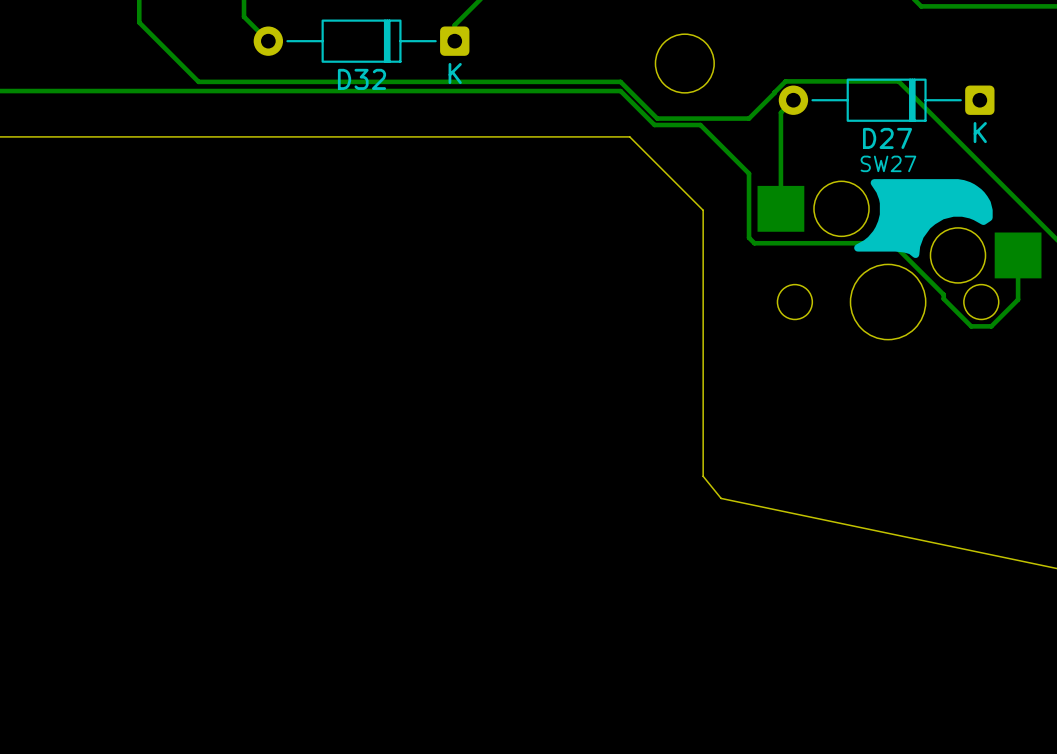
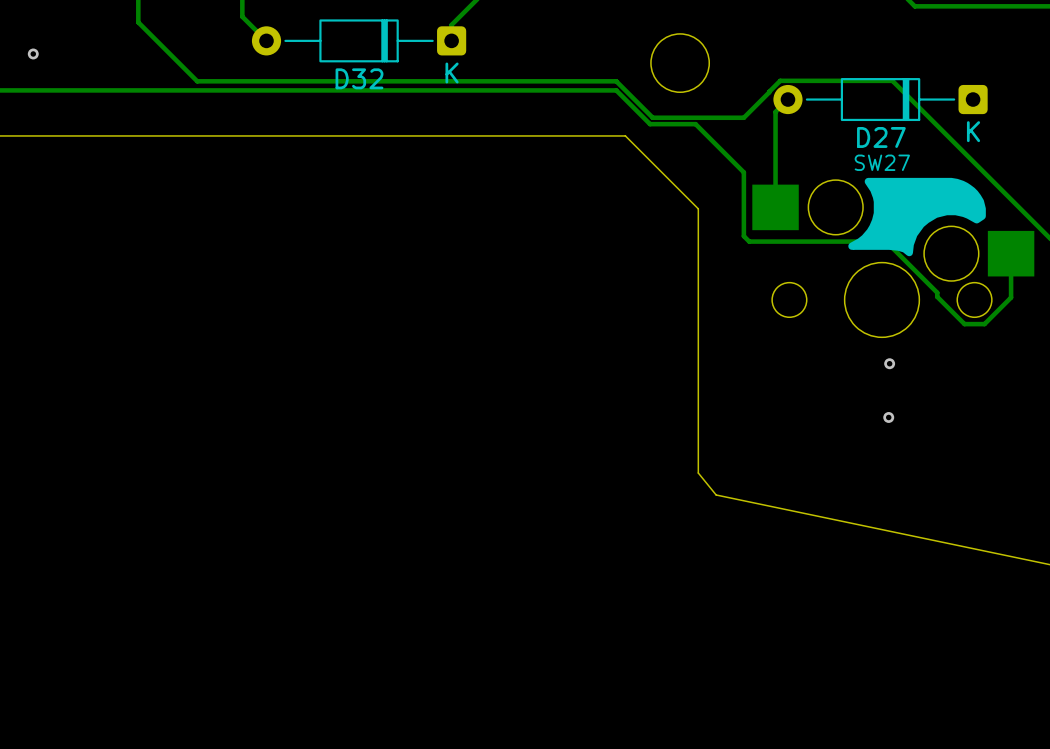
via: none -> (33, 53)
via: none -> (889, 363)
via: none -> (888, 417)

